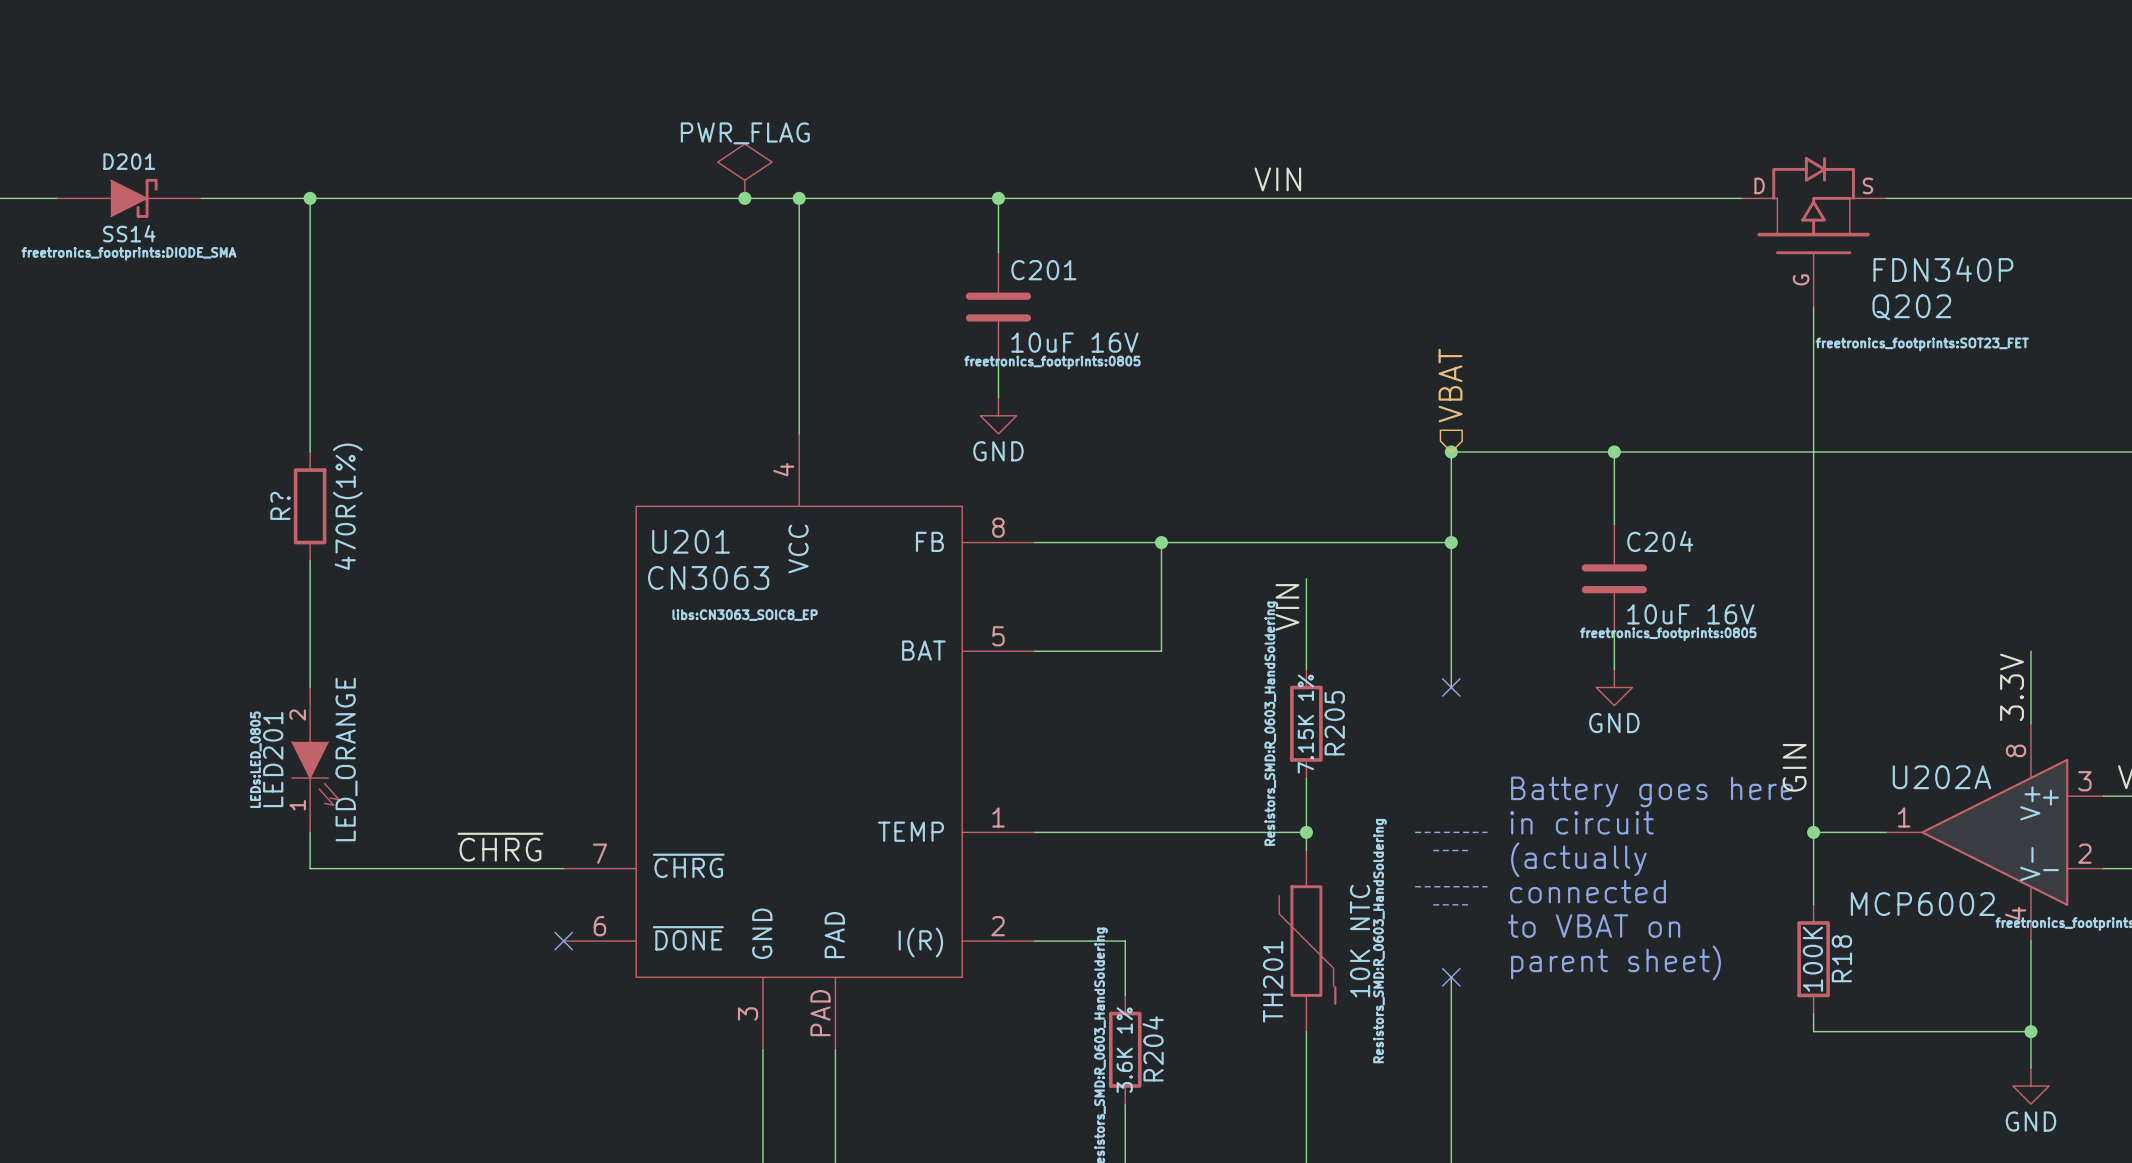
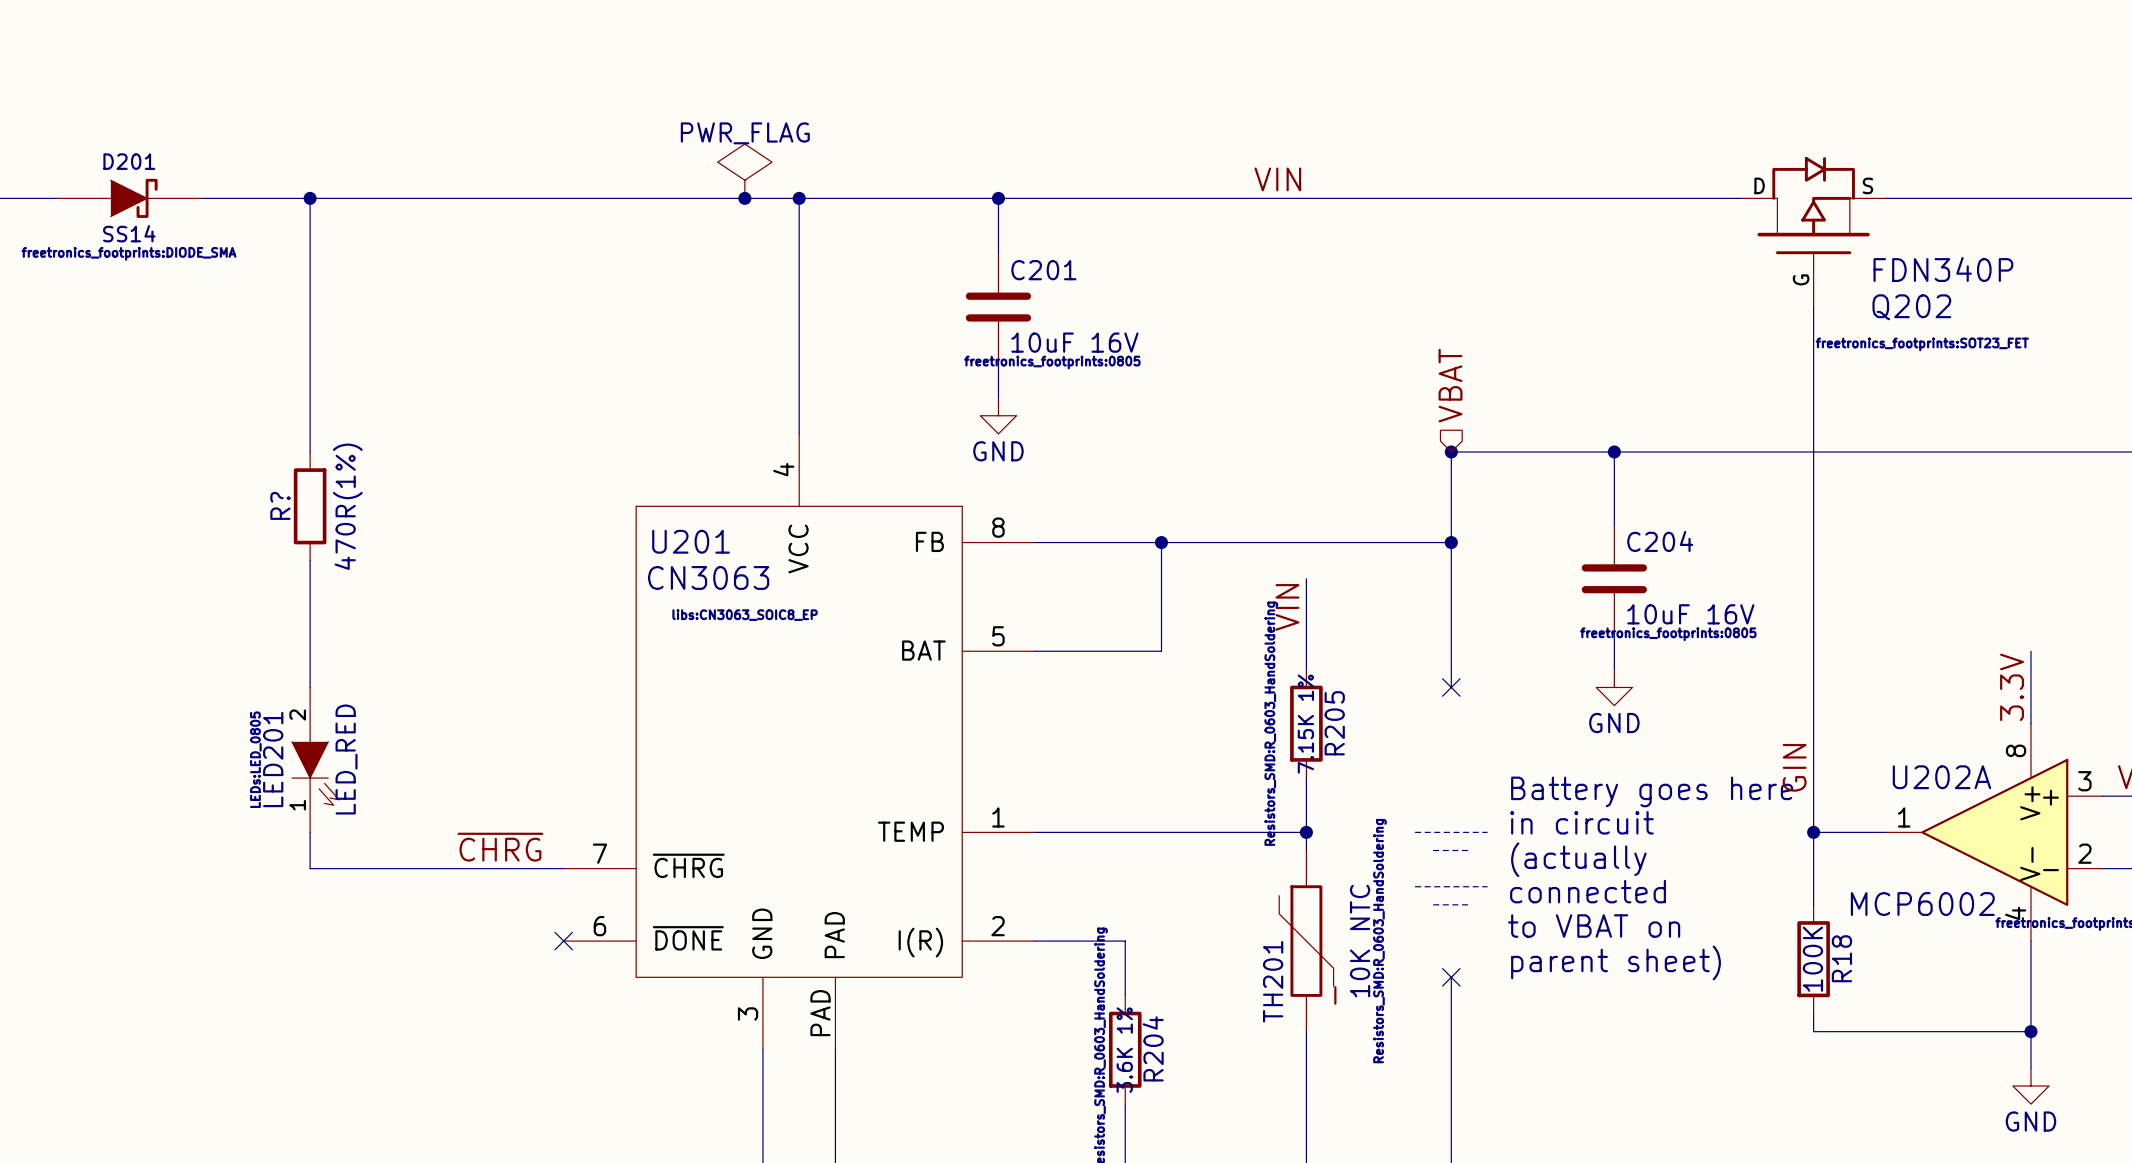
LED201 value: LED_ORANGE (346, 759) -> LED_RED (346, 759)

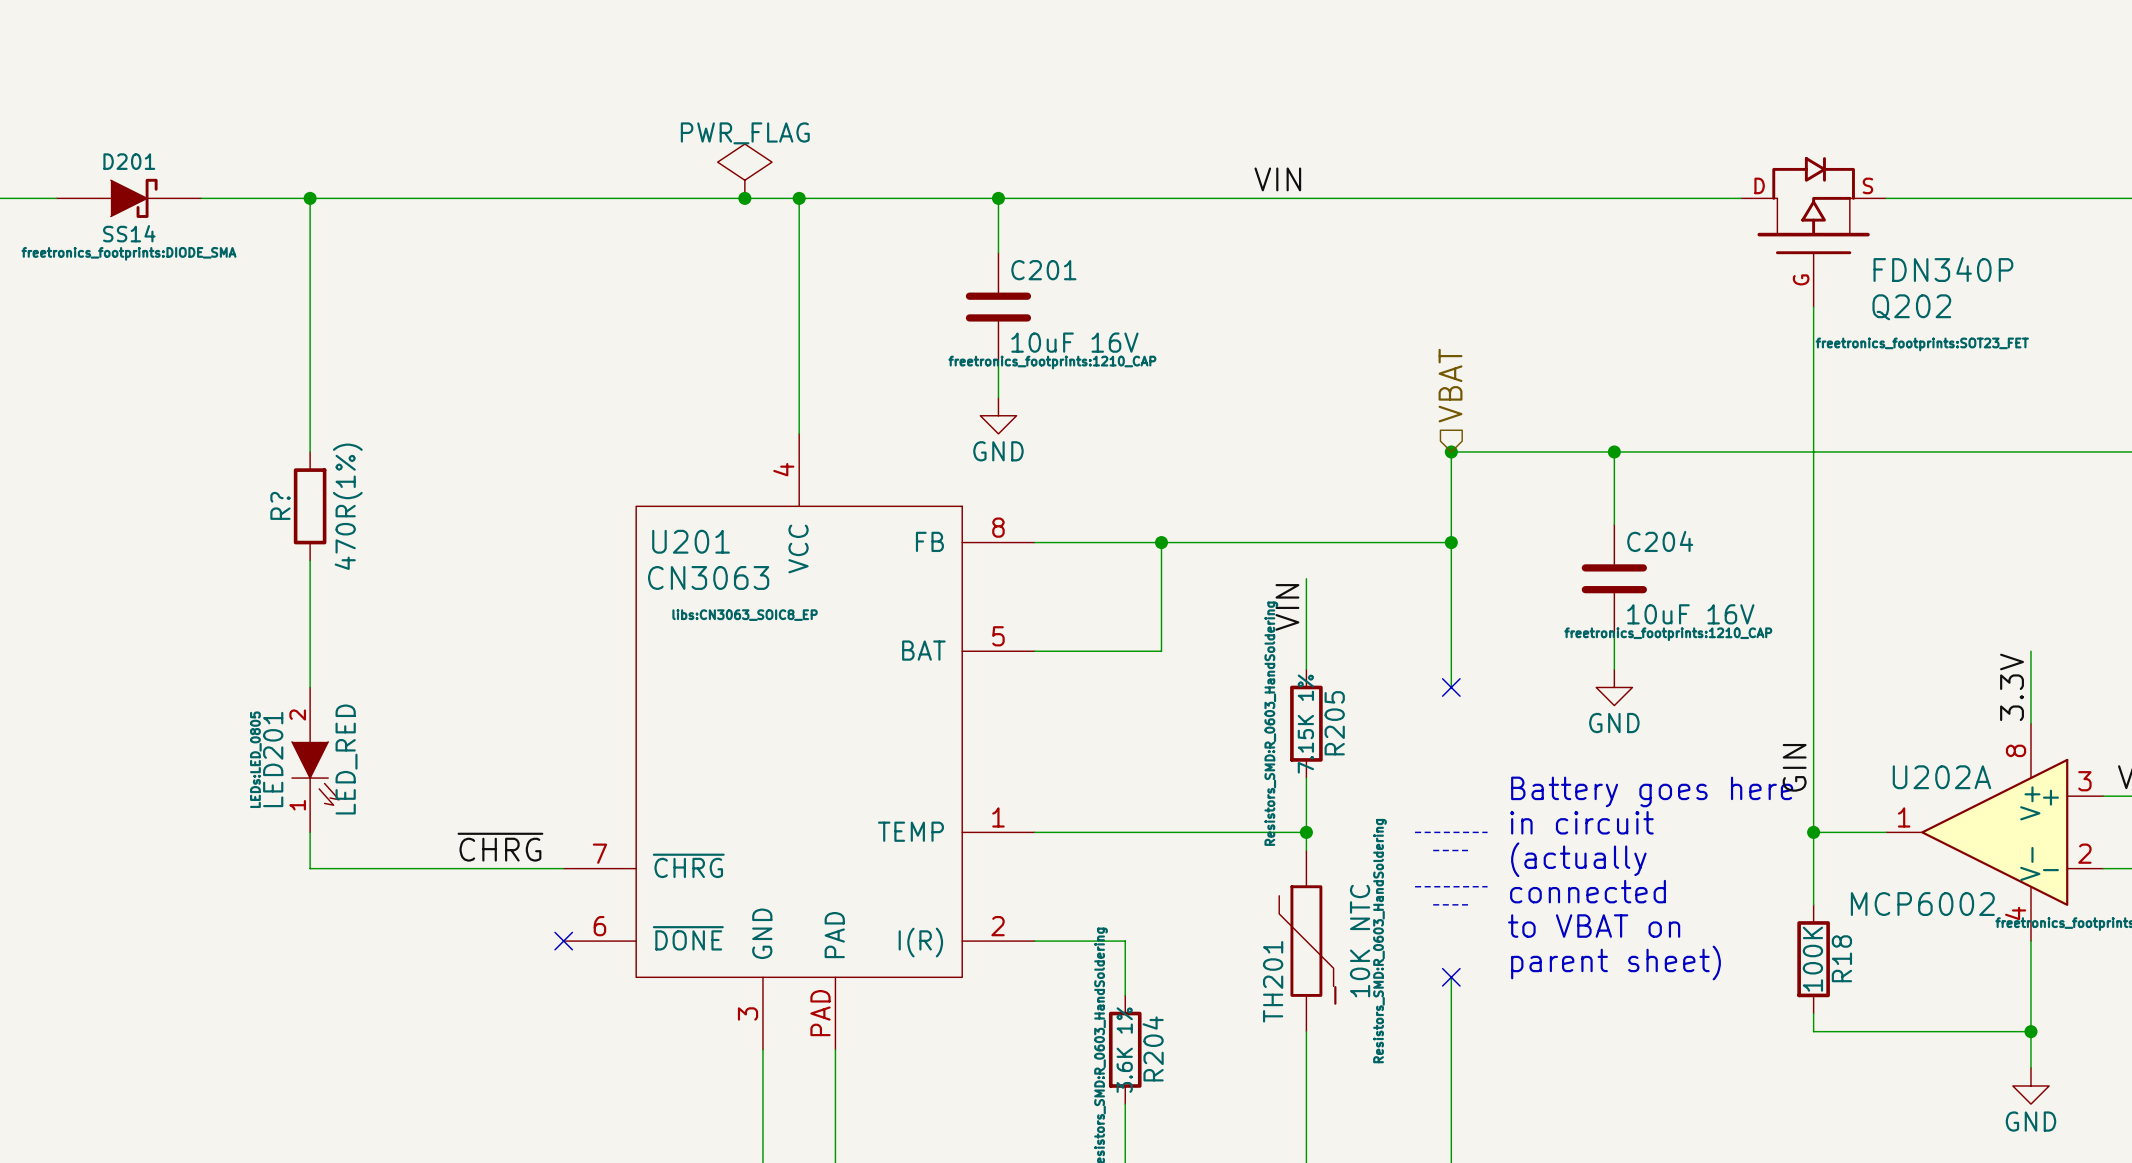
C201 text: freetronics_footprints:0805 (1052, 362) -> freetronics_footprints:1210_CAP (1052, 362)
C204 text: freetronics_footprints:0805 (1668, 634) -> freetronics_footprints:1210_CAP (1668, 634)

